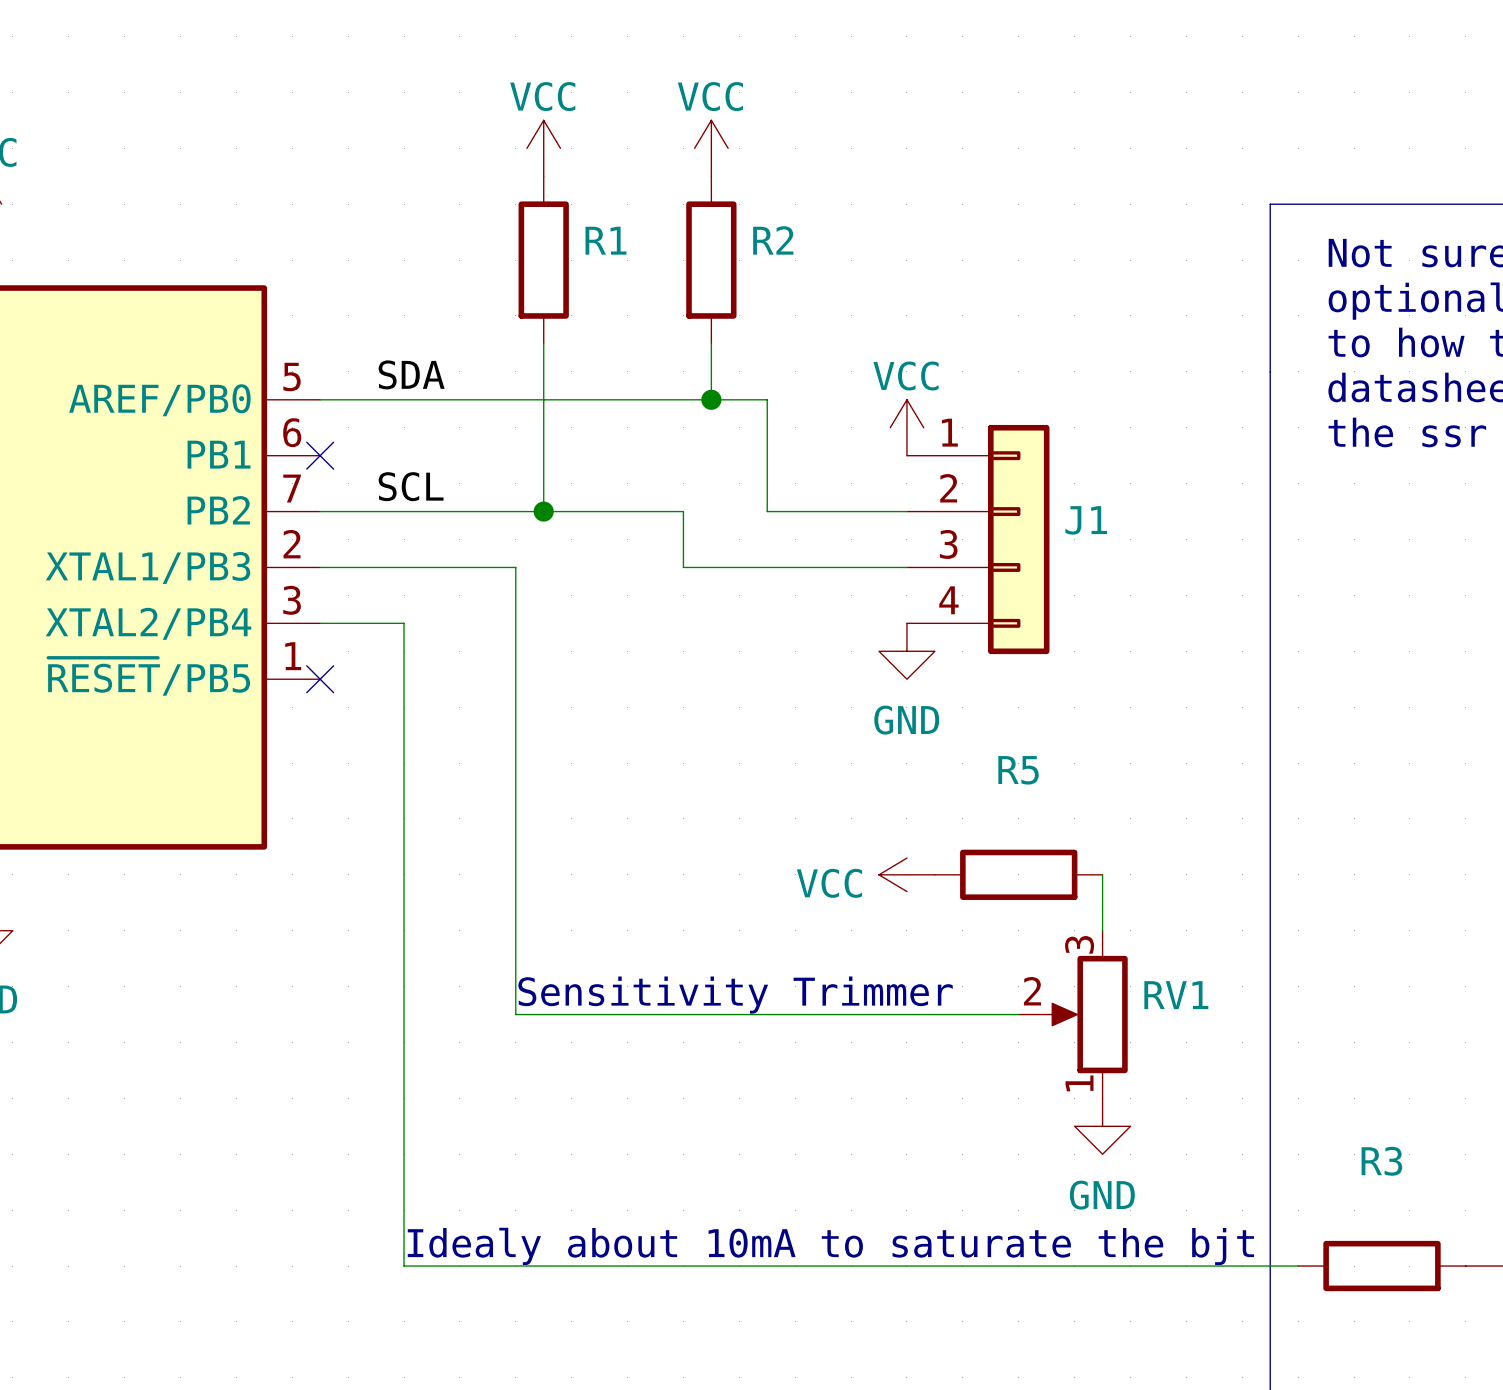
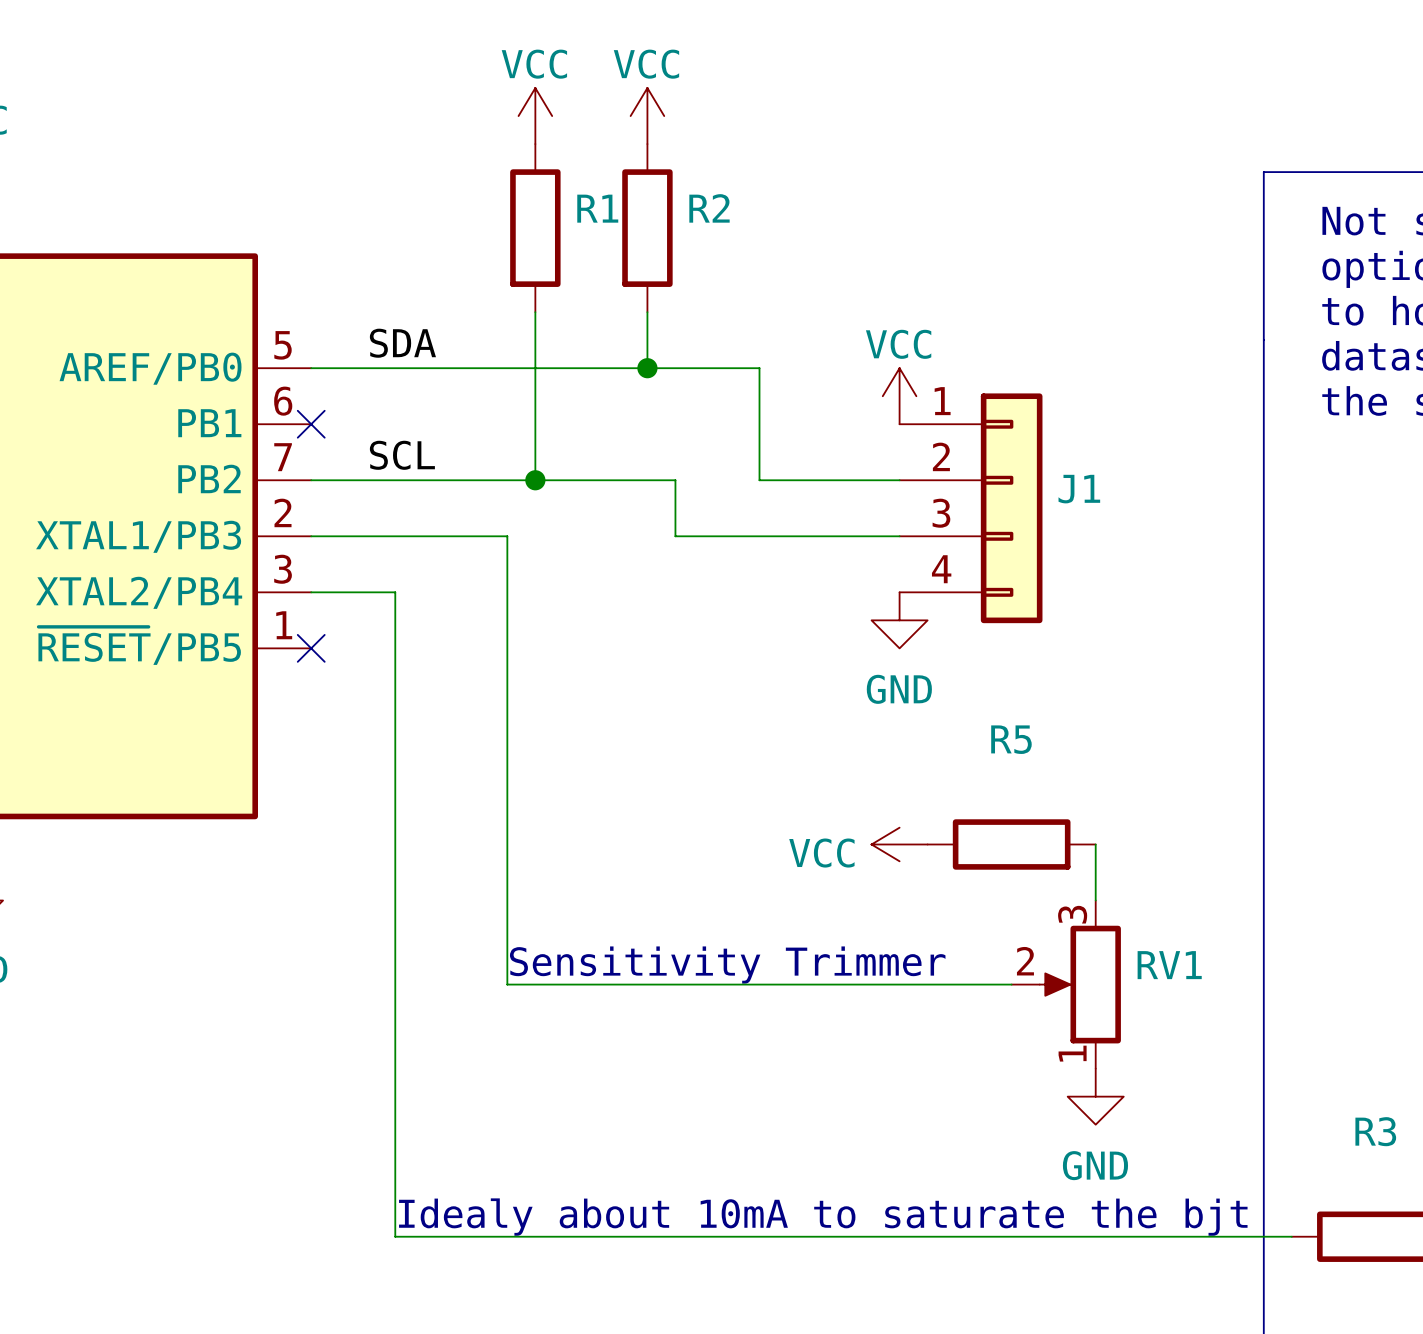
power symbol position: VCC (711, 148) -> VCC (647, 116)
R2 position: (711, 260) -> (647, 228)
wire: (711, 343) (711, 399) -> (647, 312) (647, 368)
junction position: (711, 399) -> (647, 368)

